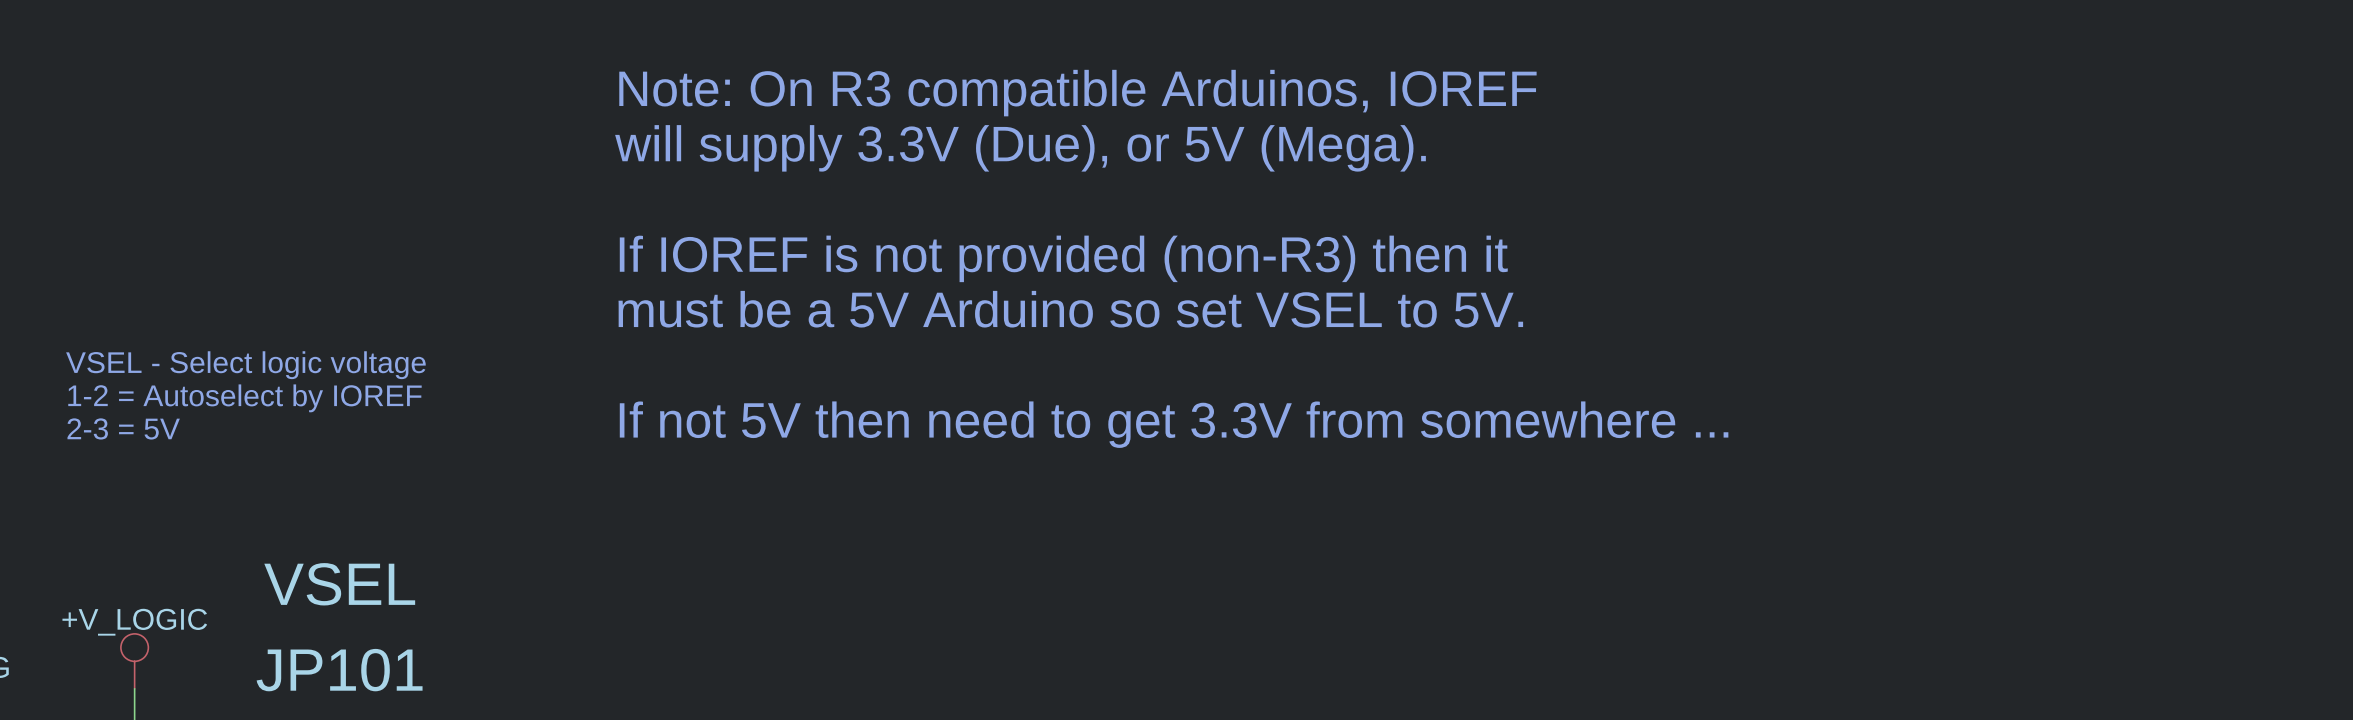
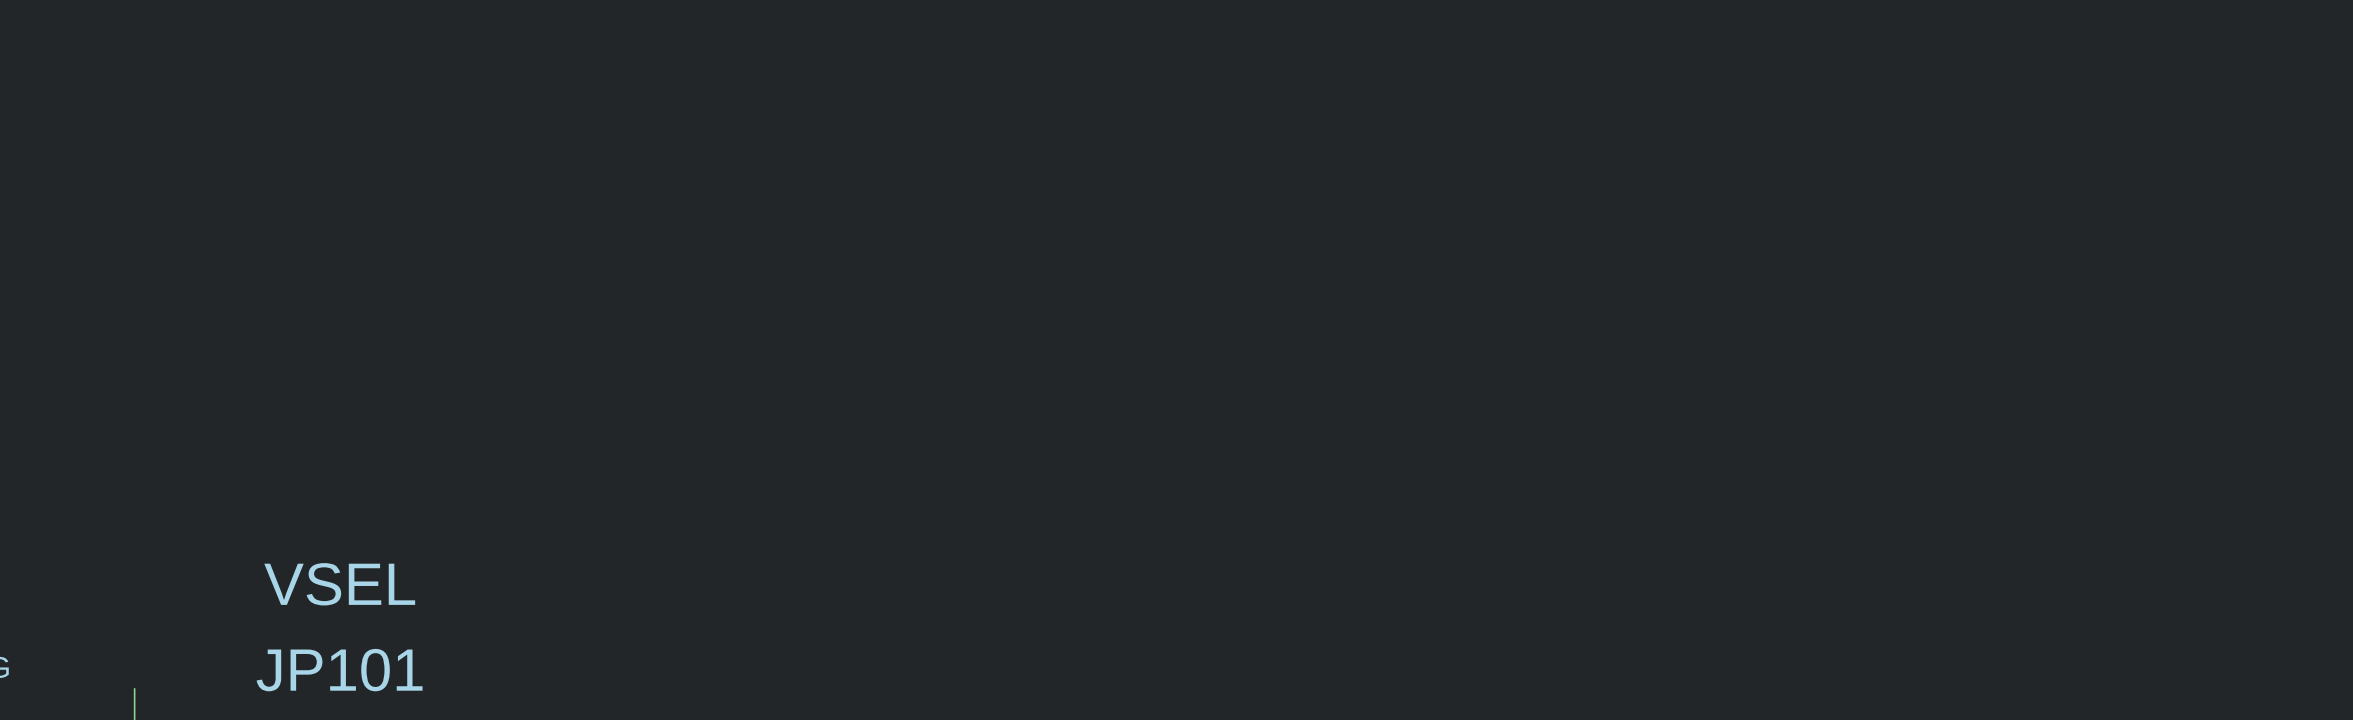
text: Note: On R3 compatible Arduinos, IOREF (1077, 93) -> none
text: will supply 3.3V (Due), or 5V (Mega). (1020, 148) -> none
text: If IOREF is not provided (non-R3) then it (1063, 258) -> none
text: must be a 5V Arduino so set VSEL to 5V. (1070, 309) -> none
text: VSEL - Select logic voltage (245, 365) -> none
text: 1-2 = Autoselect by IOREF (244, 398) -> none
text: If not 5V then need to get 3.3V from somewhere ... (1174, 424) -> none
text: 2-3 = 5V (123, 428) -> none
power symbol: +V_LOGIC (134, 661) -> none

